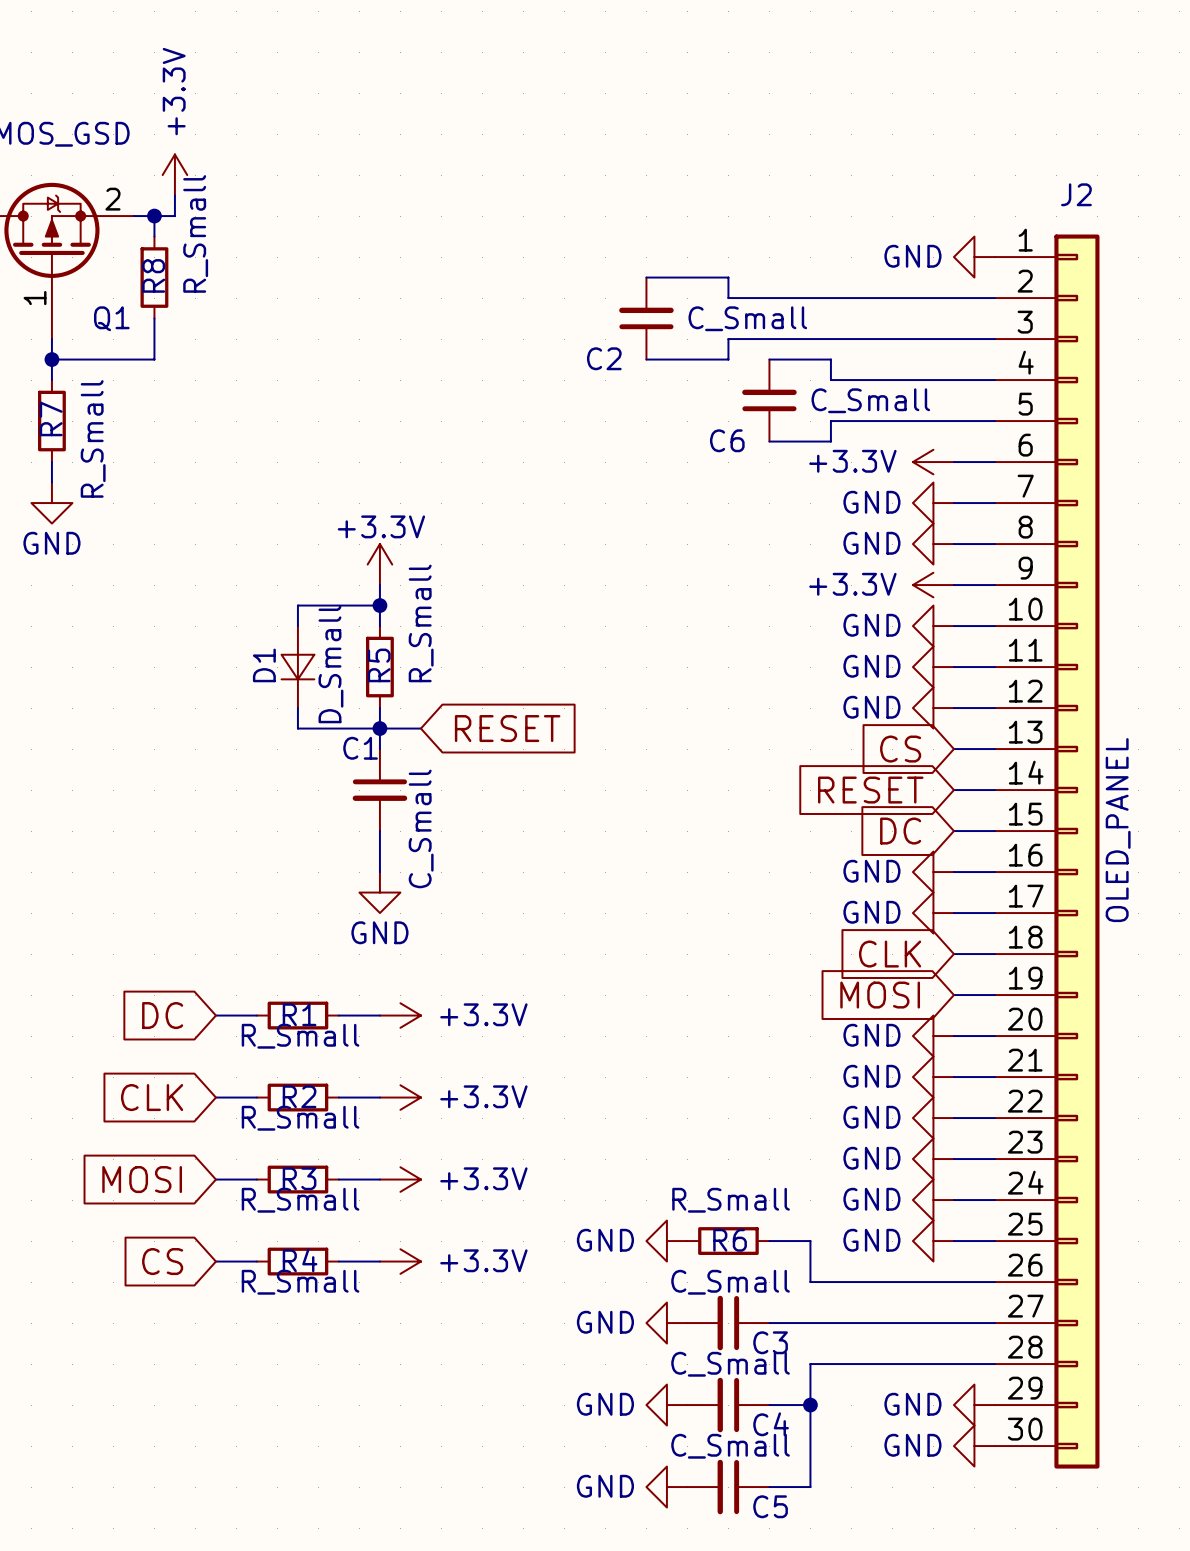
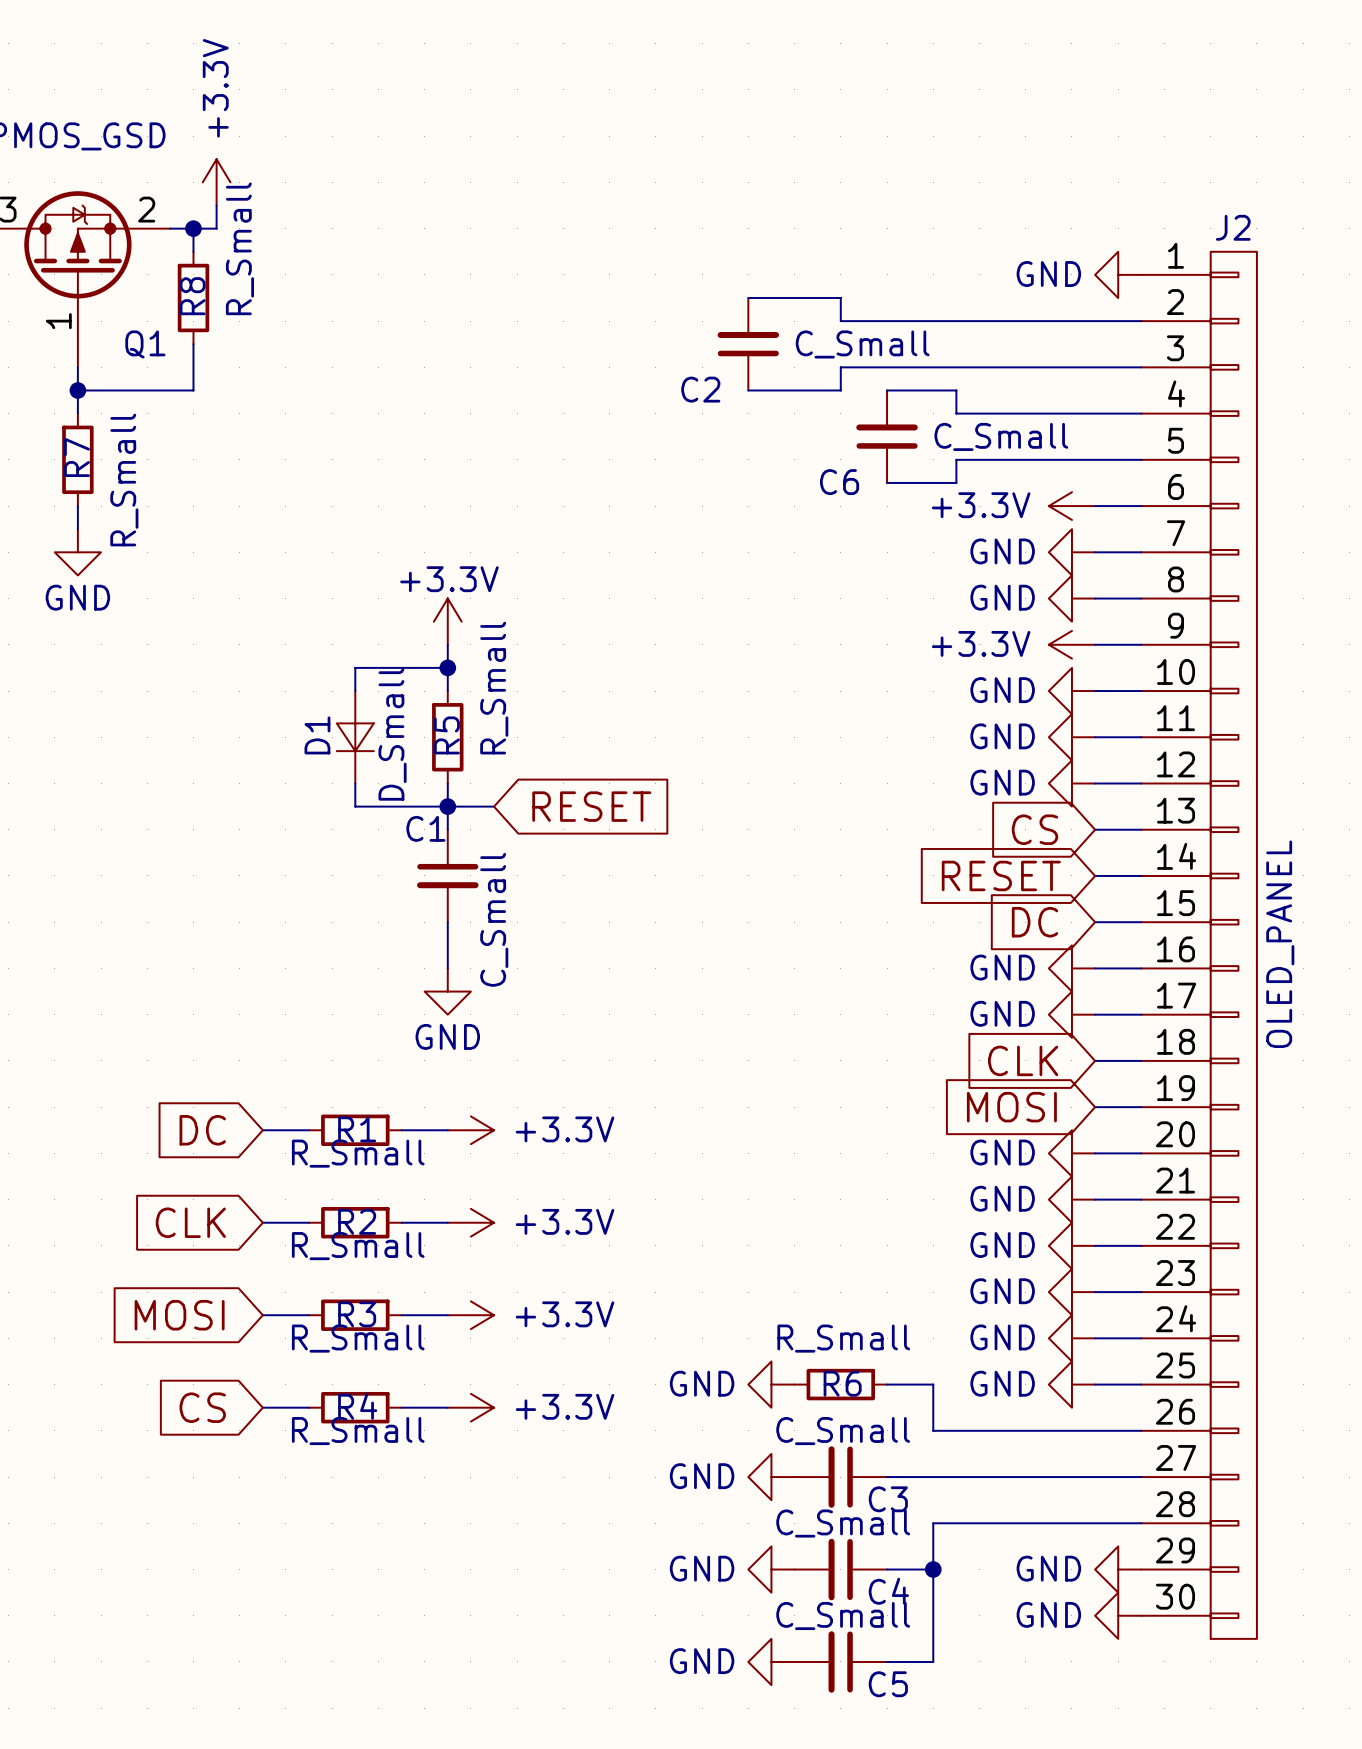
J2 symbol: [994, 234, 1100, 1469] -> [1141, 251, 1257, 1639]

